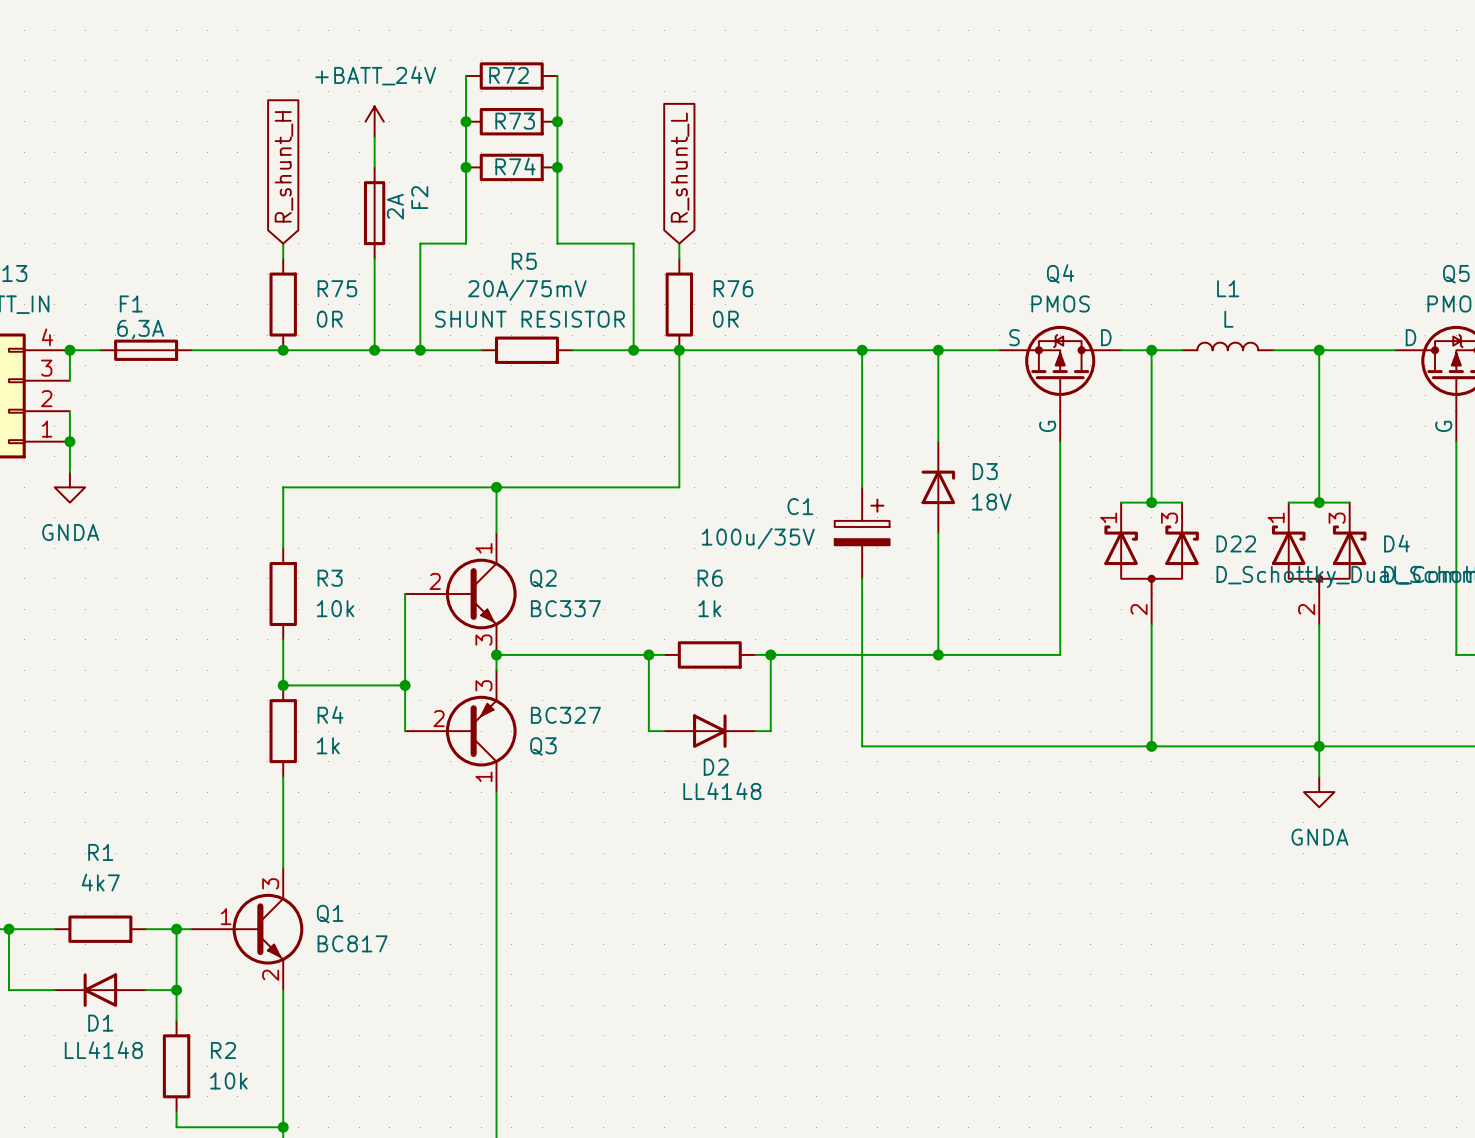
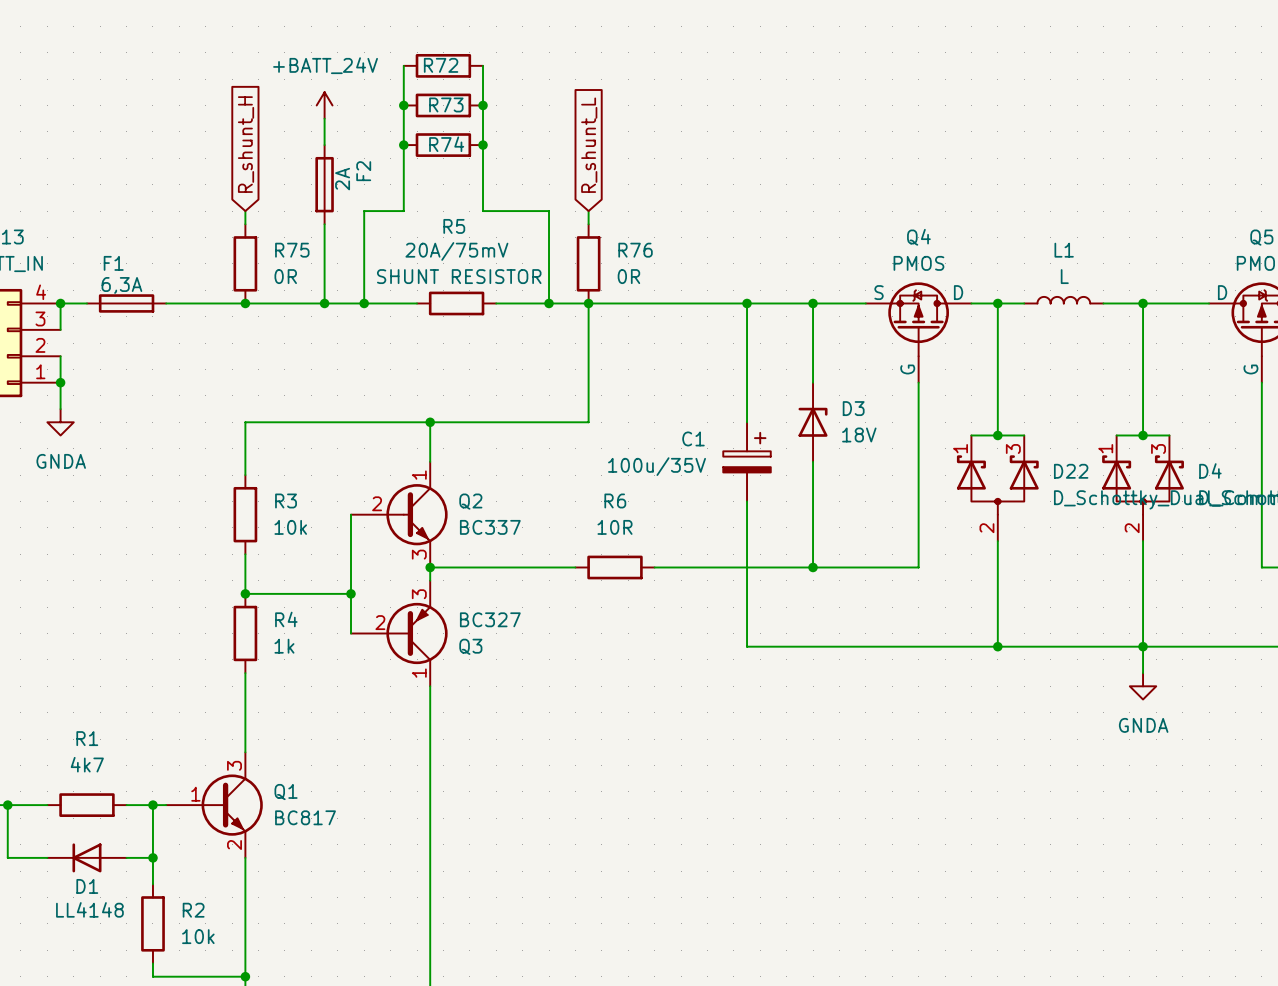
R6 value: 1k (709, 608) -> 10R (615, 527)
wire: (648, 654) (648, 731) (664, 731) -> none
junction: (648, 654) -> none
wire: (770, 654) (770, 731) (755, 731) -> none
junction: (770, 654) -> none
D2: LL4148 (709, 731) -> none

